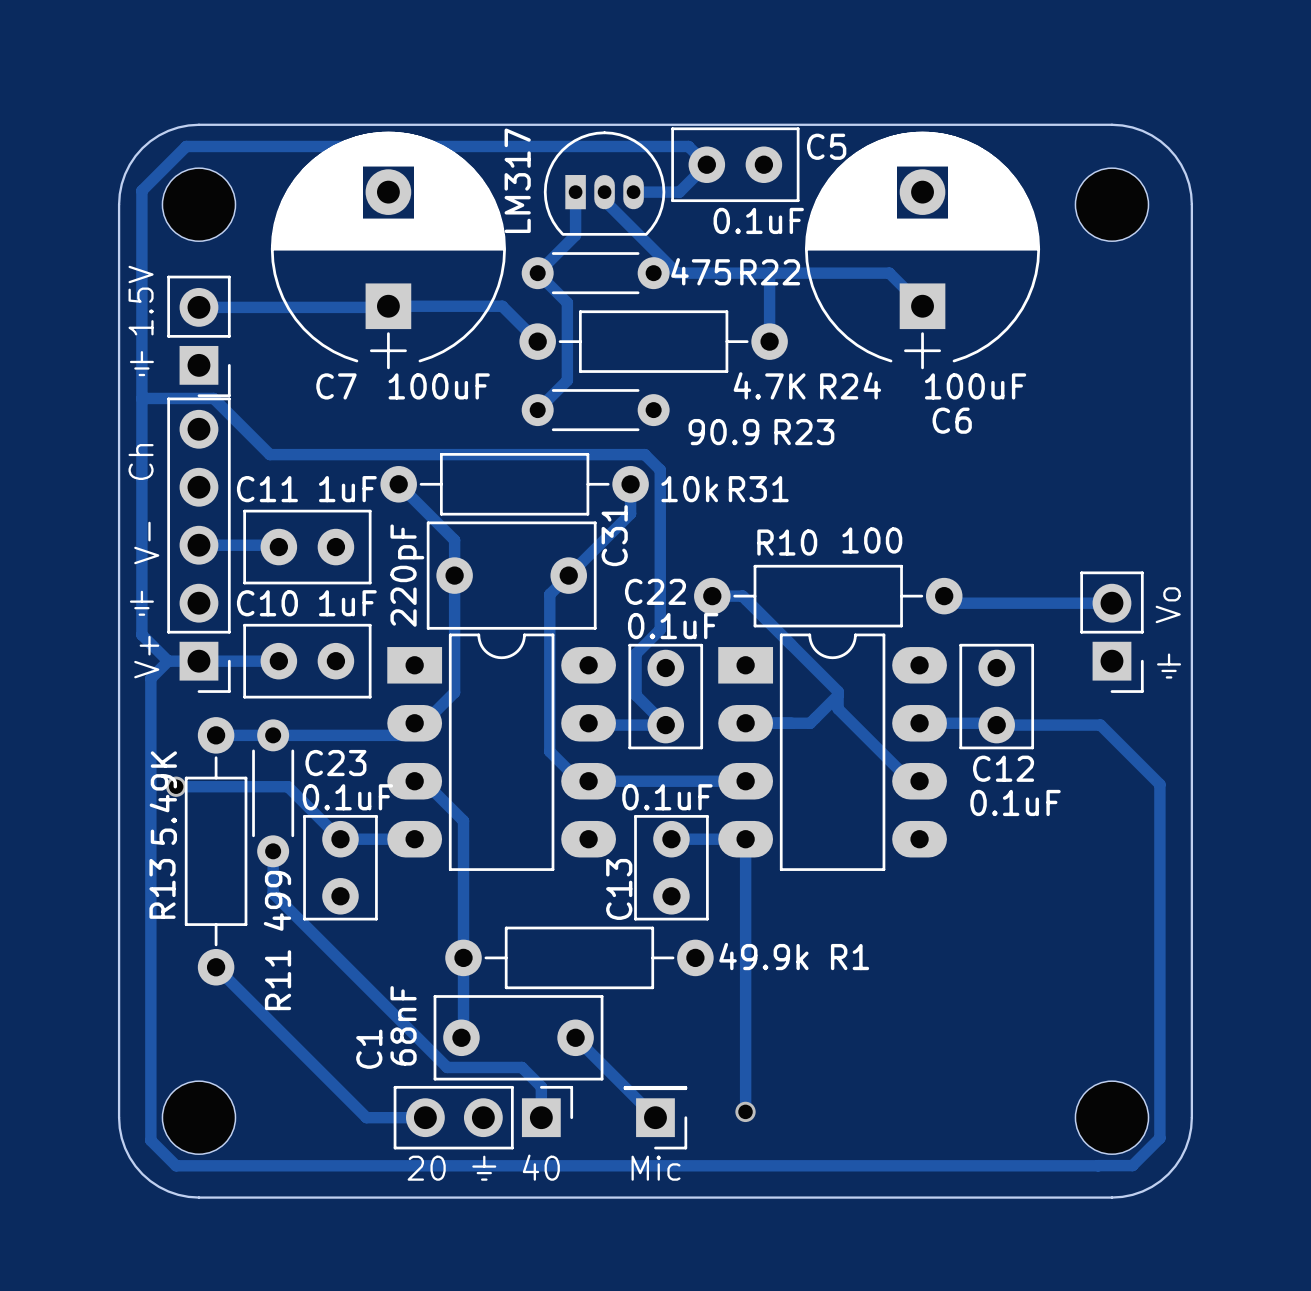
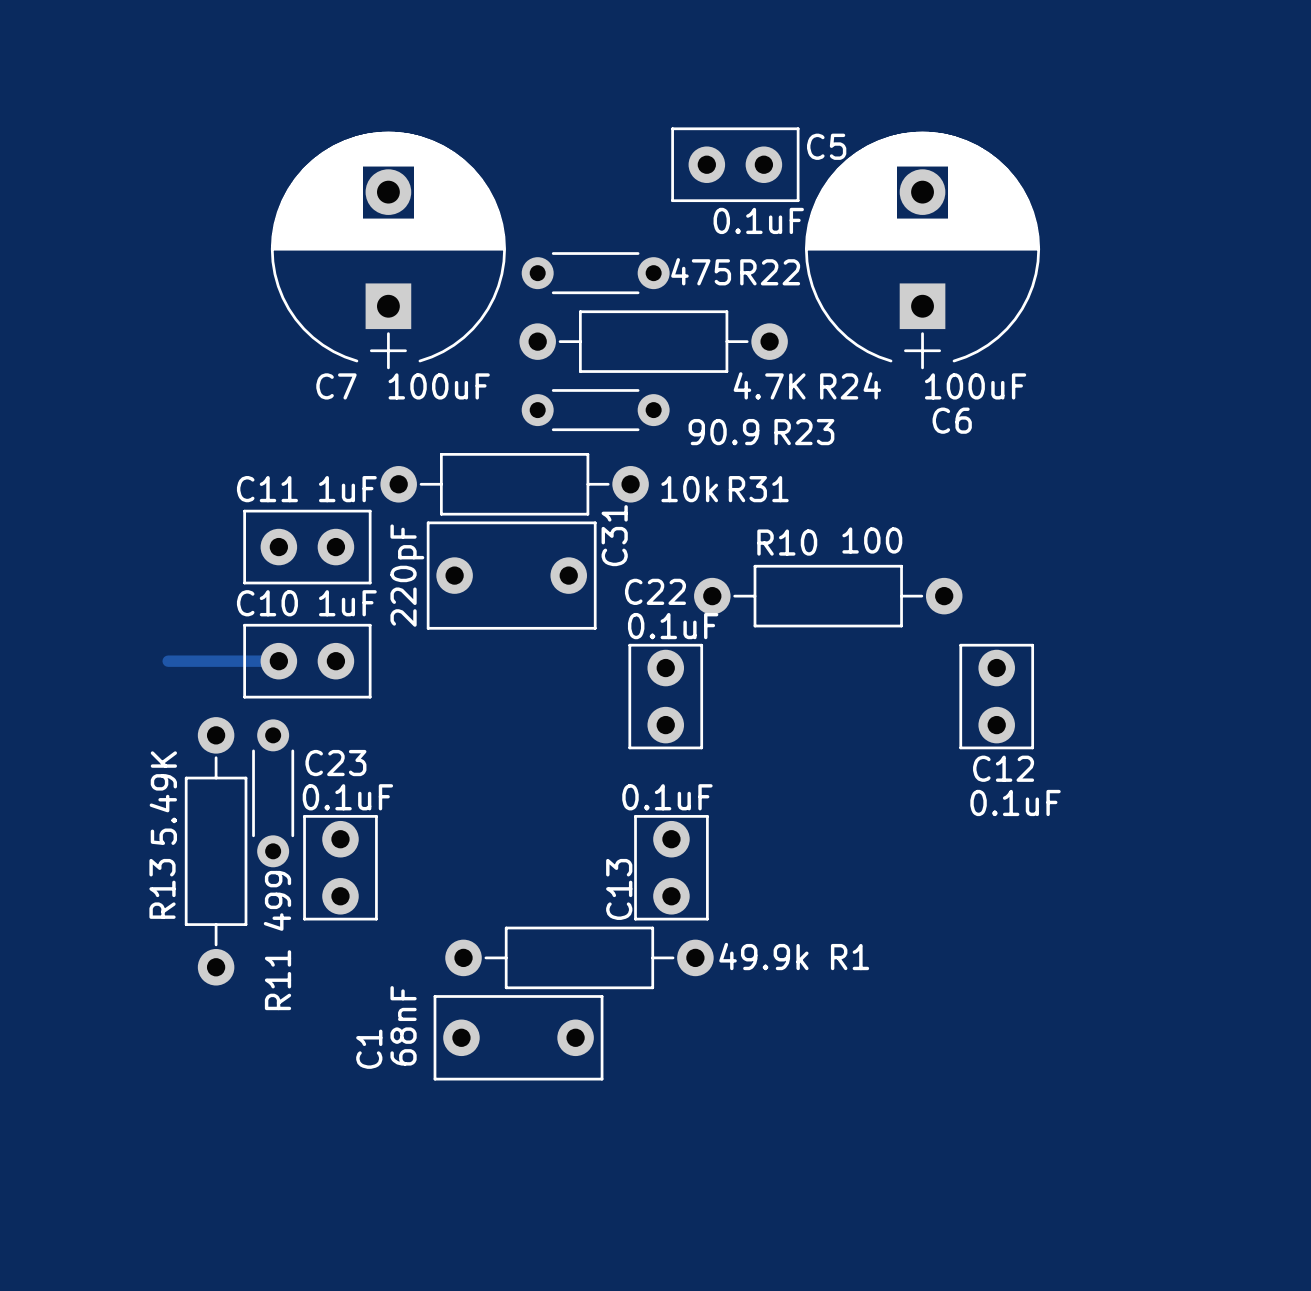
board edge: (198, 124) (1111, 124) (1142, 130) (1168, 148) (1185, 174) (1191, 204) (1191, 1117) (1185, 1148) (1168, 1174) (1142, 1191) (1111, 1197) (198, 1197) (168, 1191) (142, 1174) (125, 1148) (119, 1117) (119, 204) (125, 174) (142, 148) (168, 130) (198, 124) -> none
part: LM317 (604, 183) -> none
track: (575, 192) (575, 235) (537, 273) (567, 302) (567, 380) (537, 410) -> none
track: (604, 192) (604, 200) (677, 273) (889, 273) (922, 306) -> none
track: (633, 192) (679, 192) (706, 164) (688, 146) (186, 146) (141, 190) (141, 634) (168, 661) (150, 678) (150, 1140) (176, 1165) (1098, 1165) -> none
part: (198, 204) -> none
part: (1111, 204) -> none
track: (769, 273) (769, 341) -> none
text: 1.5V (141, 300) -> none
track: (198, 307) (502, 306) (537, 341) -> none
part: (198, 336) -> none
text: ⏚ (141, 363) -> none
track: (142, 398) (213, 398) (269, 454) (644, 454) (660, 470) (660, 629) (636, 653) (636, 695) (665, 725) (590, 725) (588, 723) -> none
text: Ch (141, 462) -> none
track: (398, 484) (454, 540) (454, 692) (423, 723) (414, 723) (402, 735) (216, 735) -> none
track: (630, 484) (630, 513) (549, 594) (549, 751) (579, 781) (745, 781) -> none
text: V- (146, 542) -> none
track: (198, 545) (277, 545) (278, 547) -> none
part: (198, 545) -> none
track: (712, 596) (742, 596) (838, 691) (838, 708) (910, 781) (919, 781) -> none
track: (944, 596) (951, 603) (1111, 603) -> none
text: ⏚ (141, 603) -> none
text: Vo (1168, 605) -> none
part: (1111, 632) -> none
text: V+ (146, 657) -> none
text: ⏚ (1169, 666) -> none
track: (838, 695) (810, 723) (745, 723) -> none
track: (919, 723) (1100, 725) (1159, 784) (1159, 1138) (1132, 1165) (1098, 1165) -> none
part: (501, 752) -> none
part: (832, 752) -> none
track: (414, 781) (423, 781) (463, 820) (463, 1035) (461, 1037) -> none
track: (176, 786) (287, 786) (340, 839) (414, 839) -> none
via: (176, 786) -> none
track: (671, 839) (745, 839) (745, 1111) -> none
track: (273, 851) (273, 893) (447, 1067) (521, 1067) (541, 1086) (541, 1117) -> none
track: (216, 967) (366, 1117) (425, 1117) -> none
track: (575, 1037) (655, 1117) -> none
via: (745, 1111) -> none
part: (198, 1117) -> none
part: (483, 1117) -> none
part: (655, 1117) -> none
part: (1111, 1117) -> none
text: 40 (541, 1167) -> none
text: 20 (426, 1168) -> none
text: ⏚ (484, 1168) -> none
text: Mic (656, 1168) -> none

